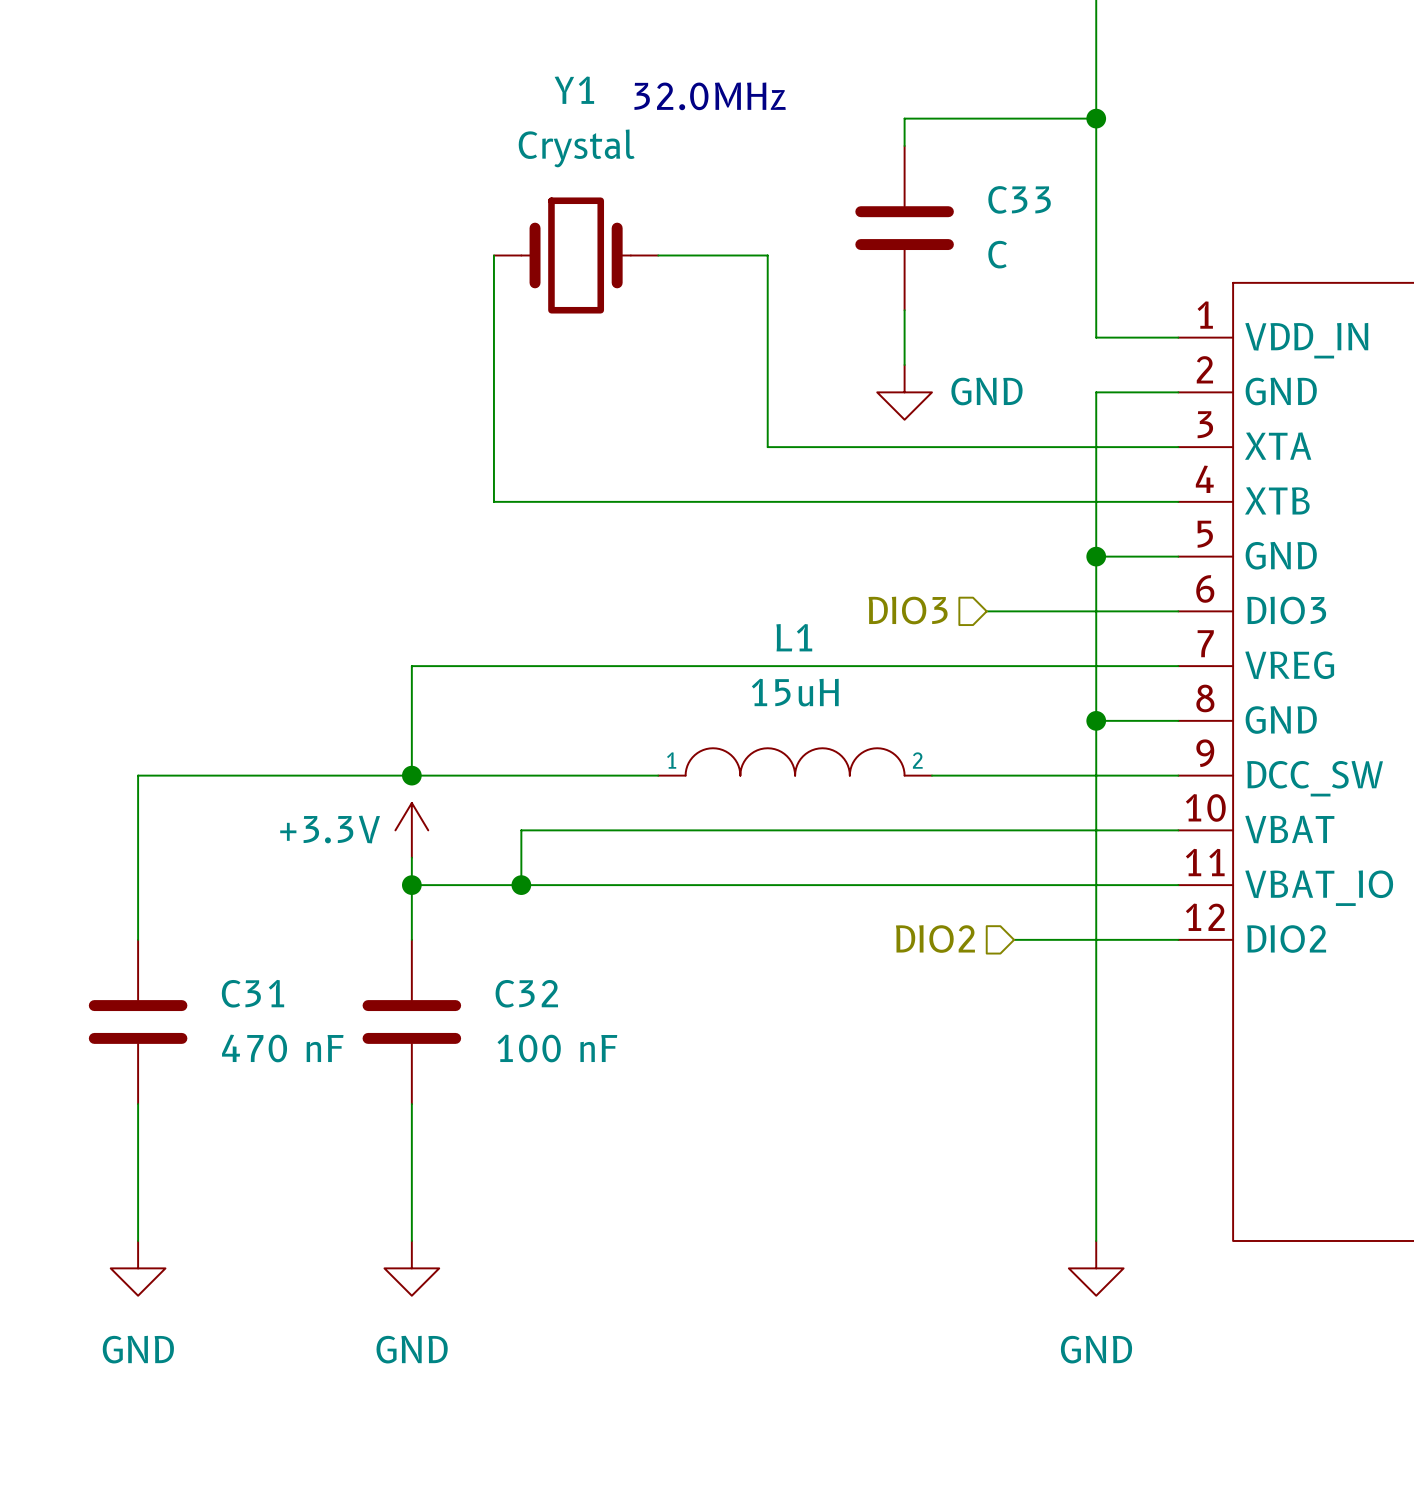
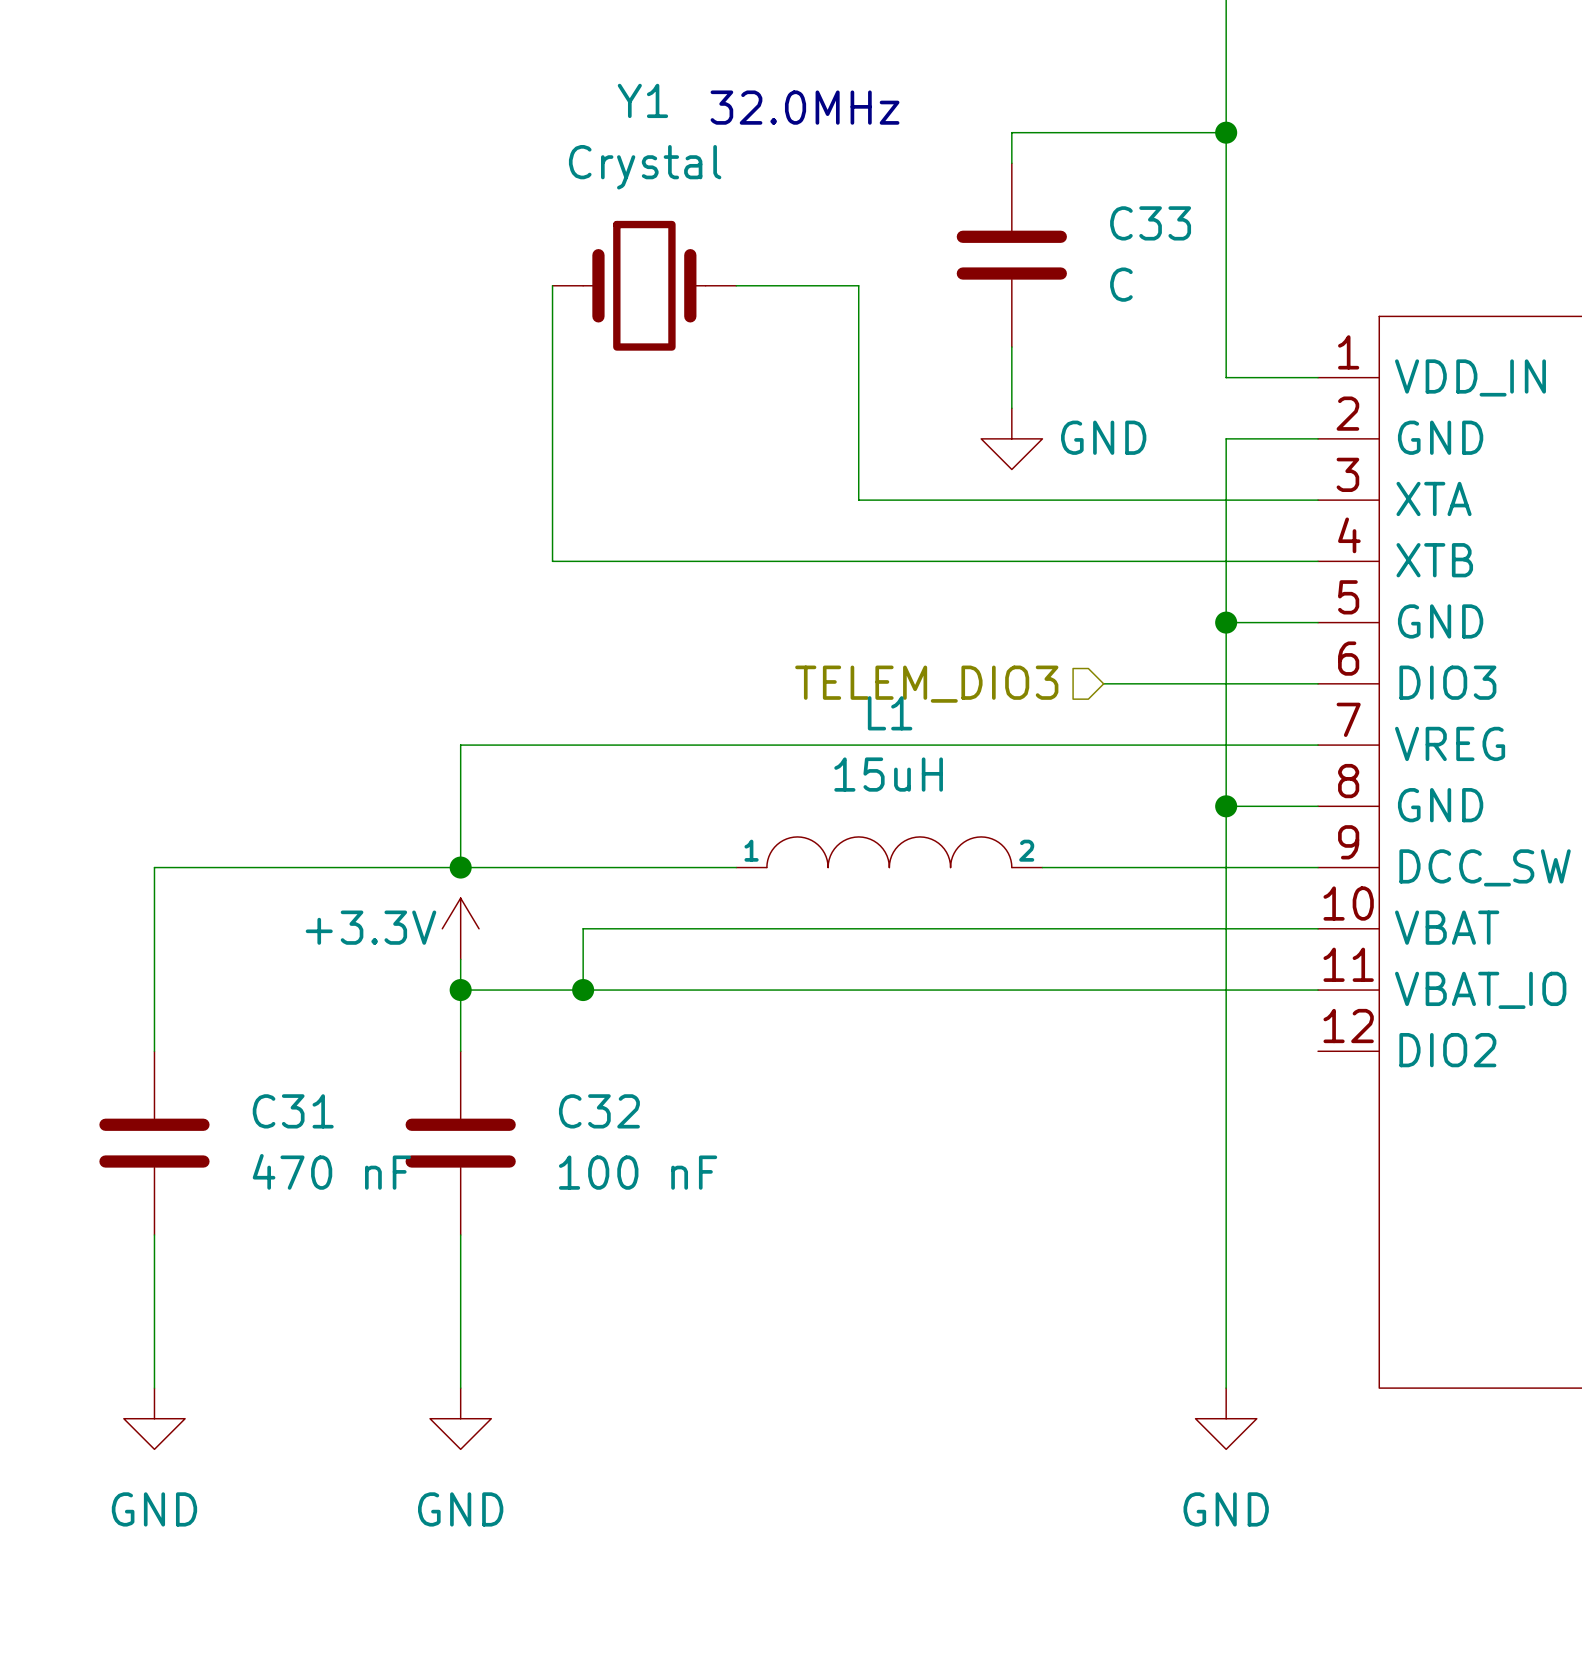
hierarchical label: DIO3 (908, 610) -> TELEM_DIO3 (926, 684)
hierarchical label: DIO2 (935, 938) -> none
wire: (1014, 939) (1178, 939) -> none

